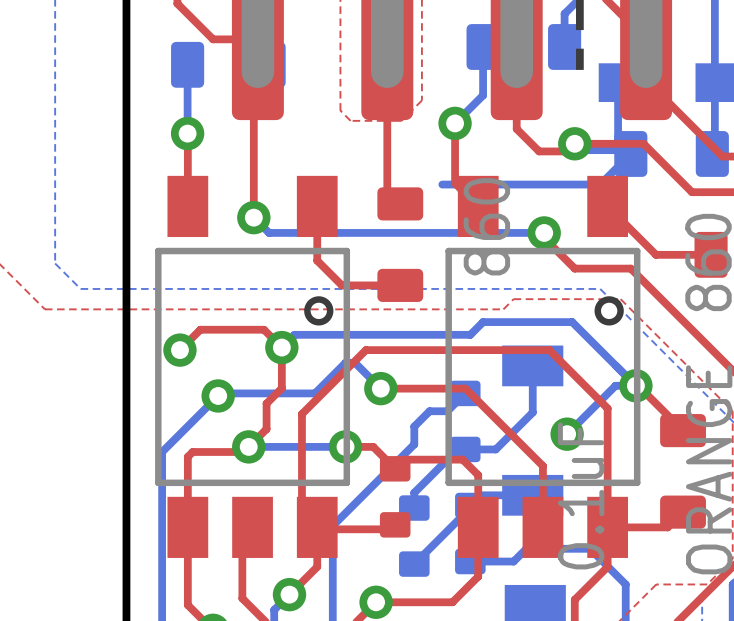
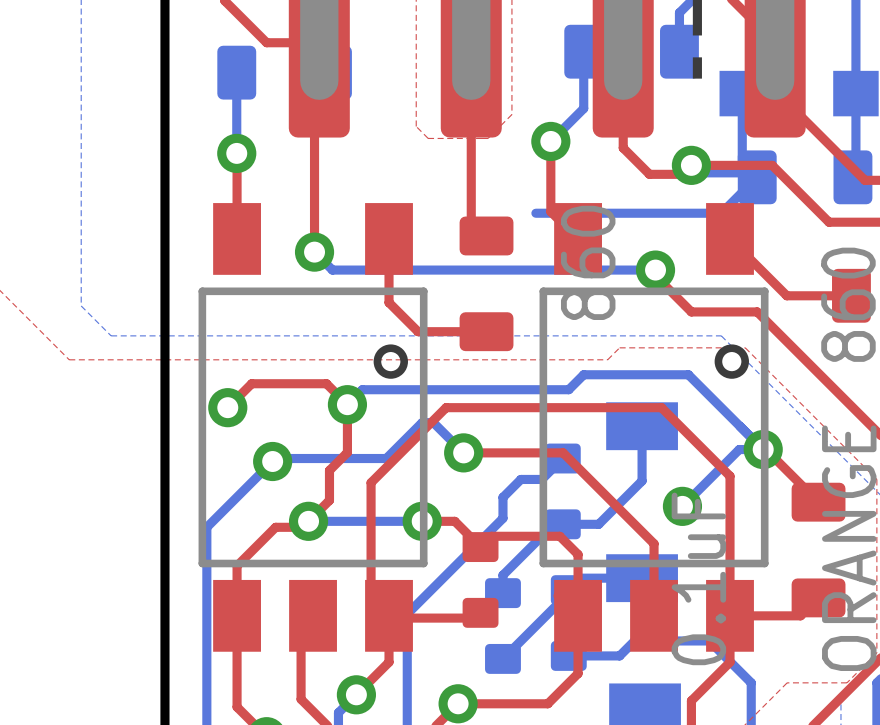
top track: (220, 452) (192, 452) (187, 456) (187, 484) -> (275, 527) (237, 565)

